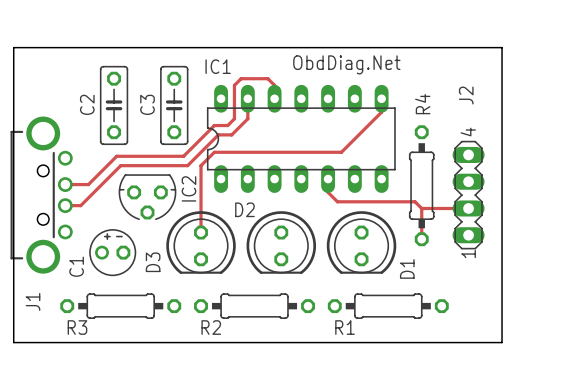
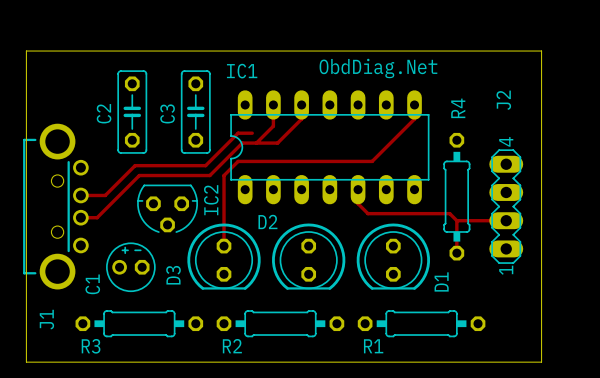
track: (274, 98) (274, 85) (267, 78) (241, 78) (234, 85) (234, 118) (227, 125) -> (301, 104) (301, 119) (277, 143) (256, 143)

